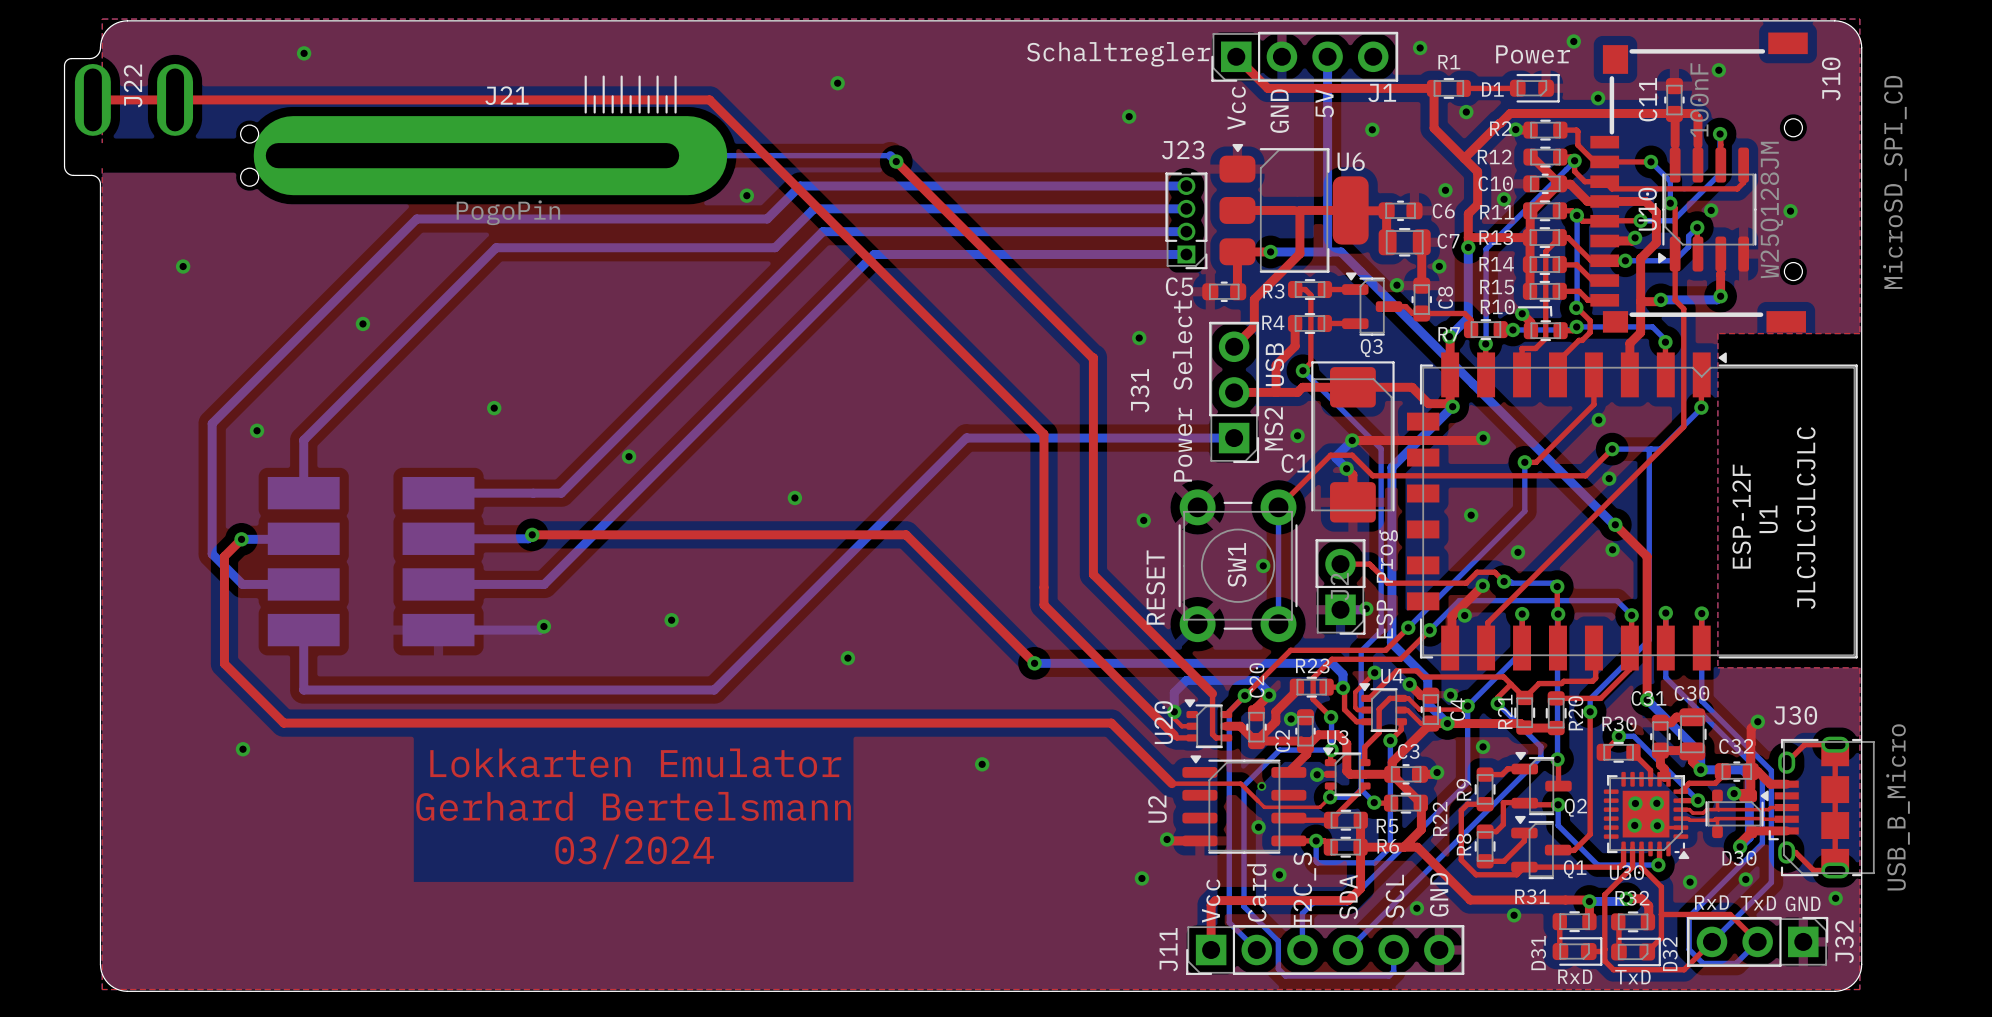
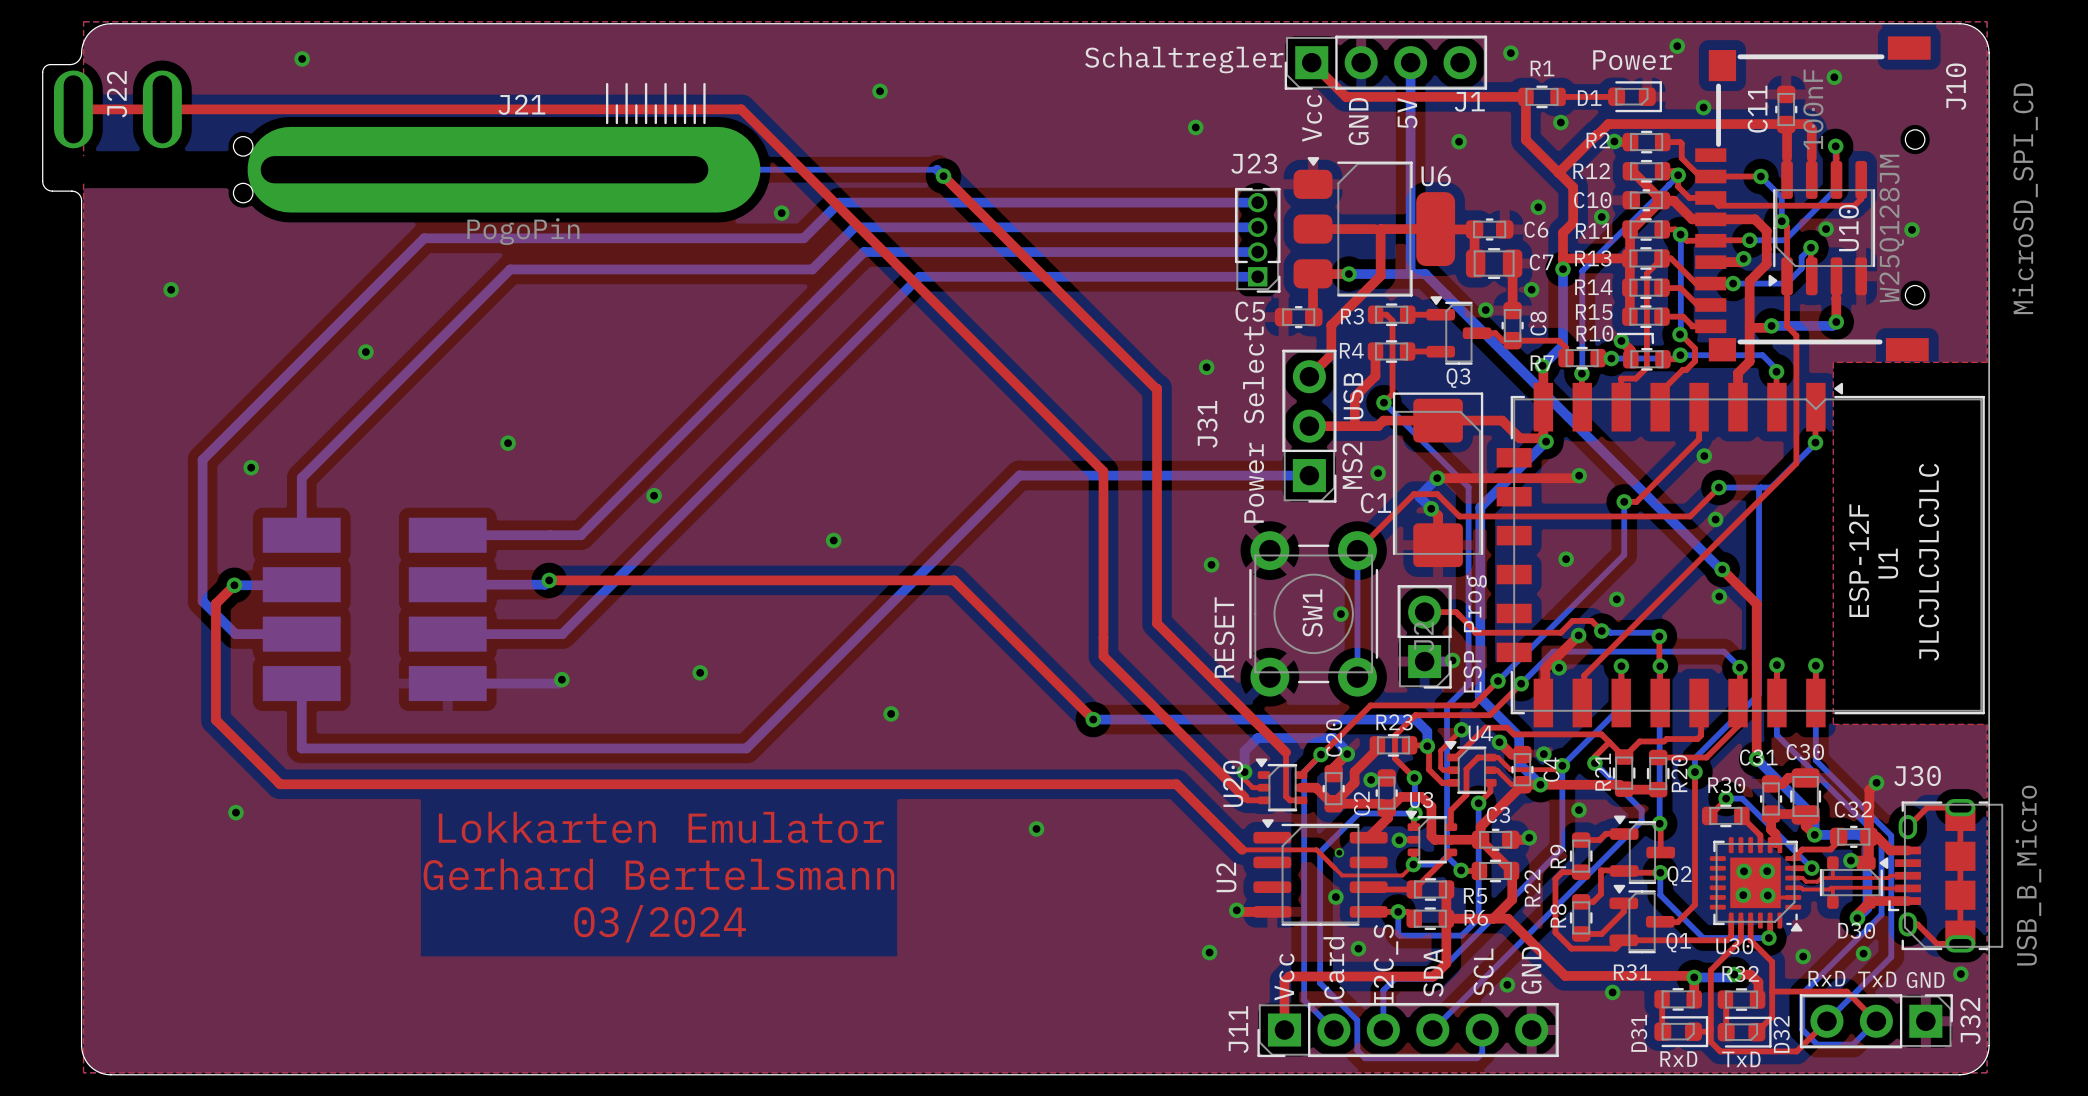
U10 name position: U10 (1647, 209) -> U10 (1848, 228)

